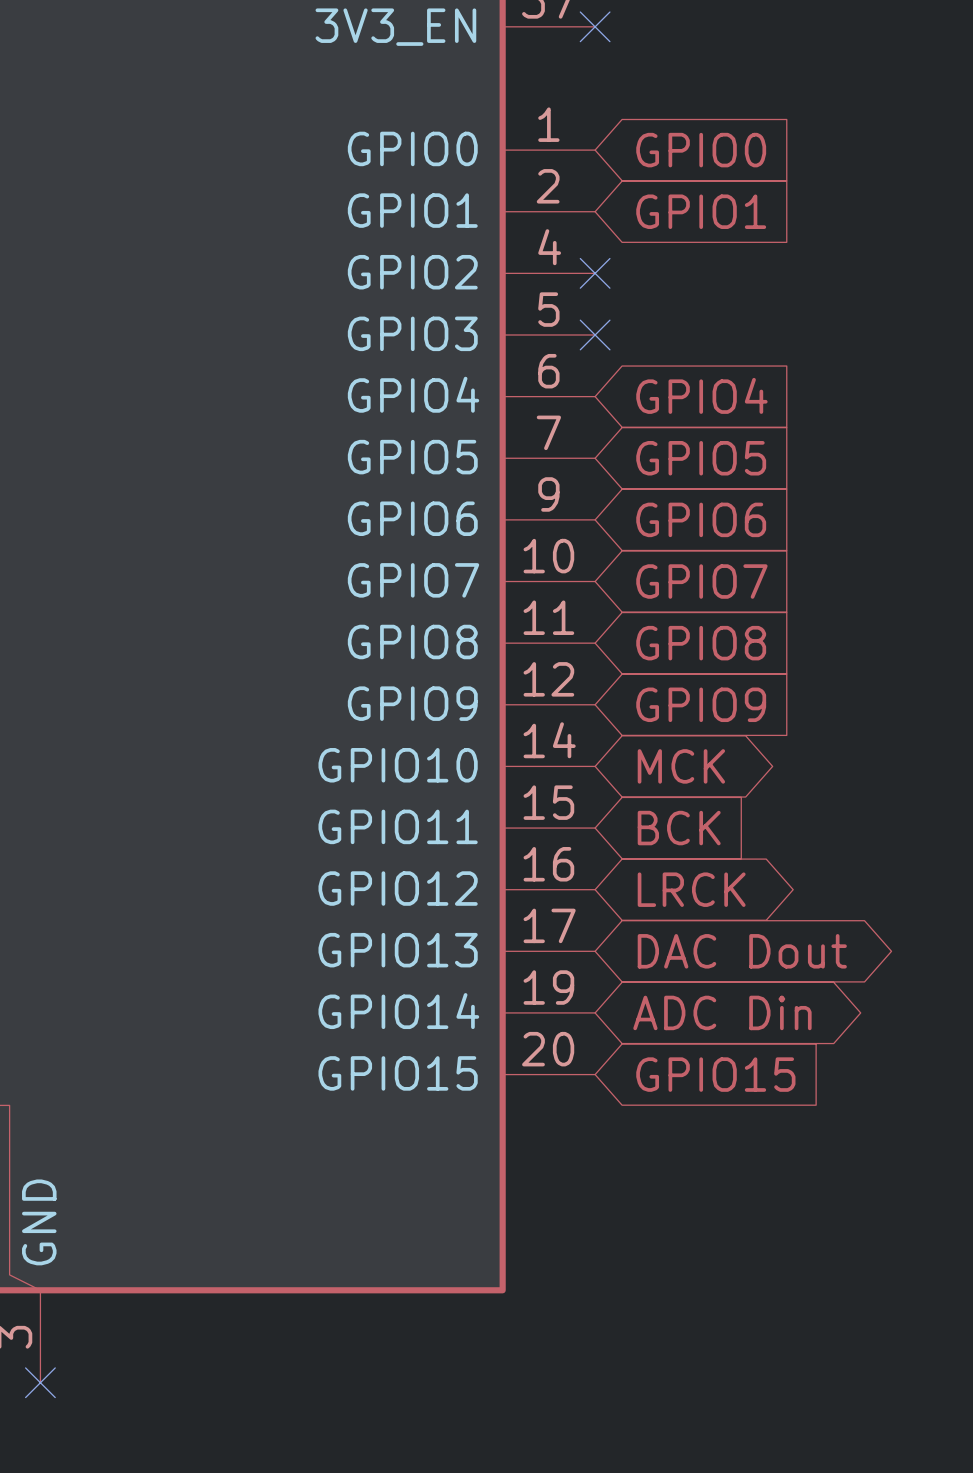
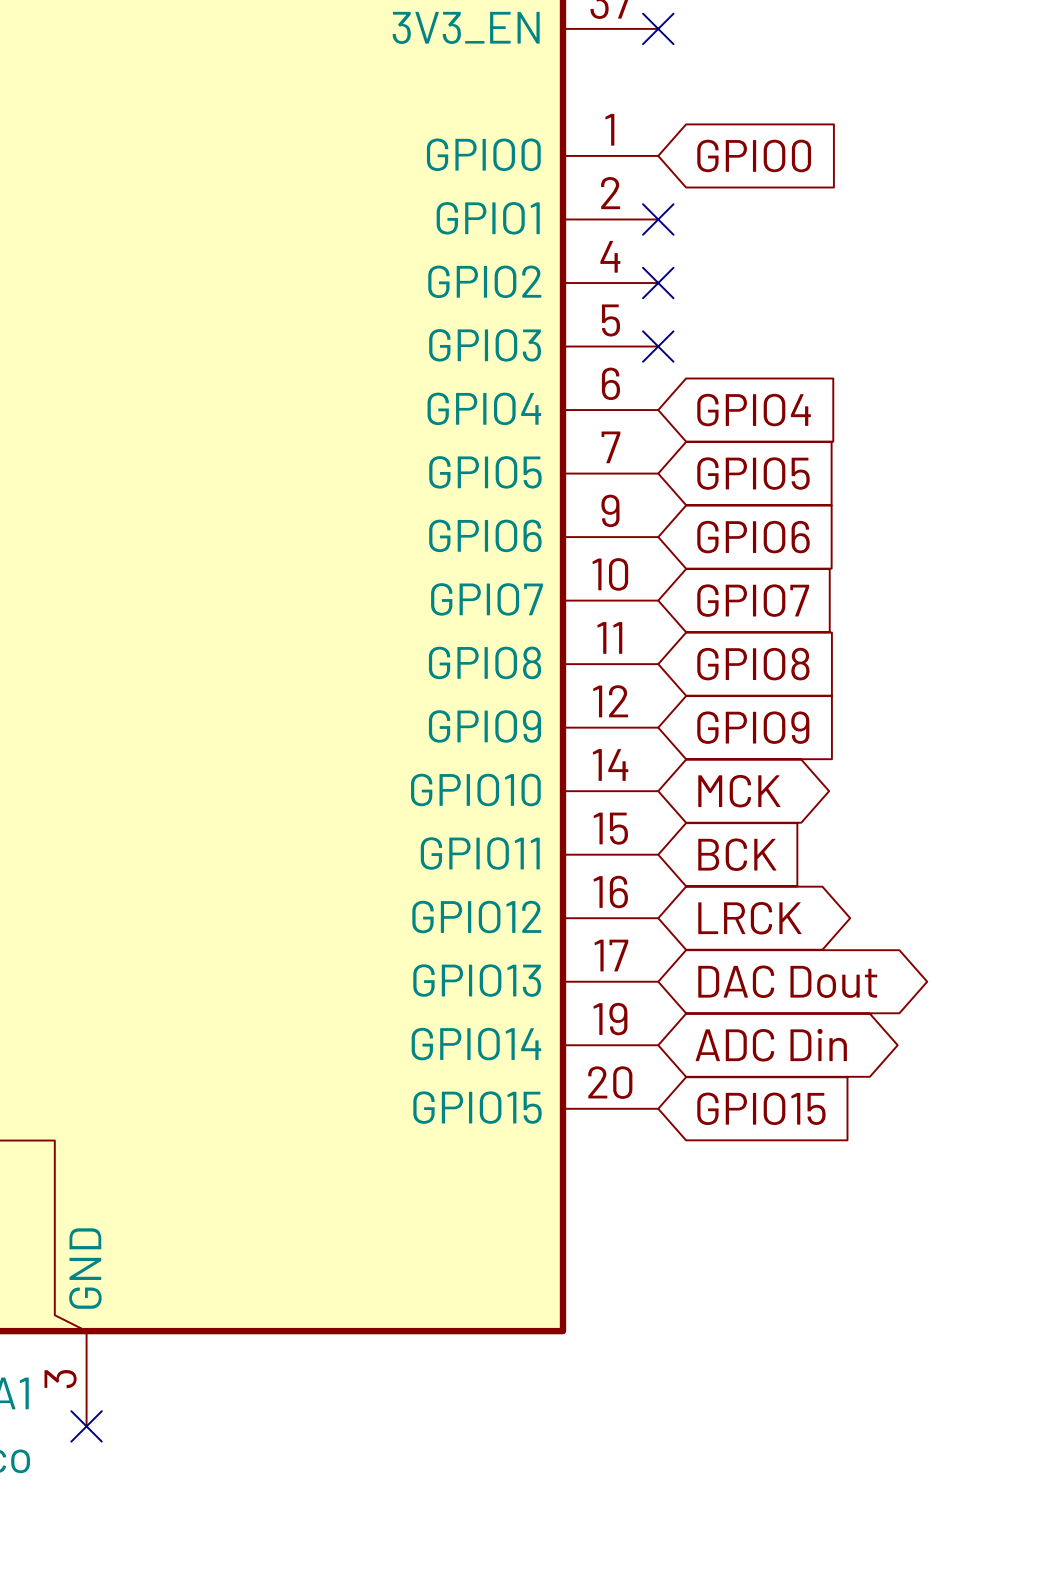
no-connect mark: none -> (658, 219)
global label: GPIO1 (701, 211) -> none

